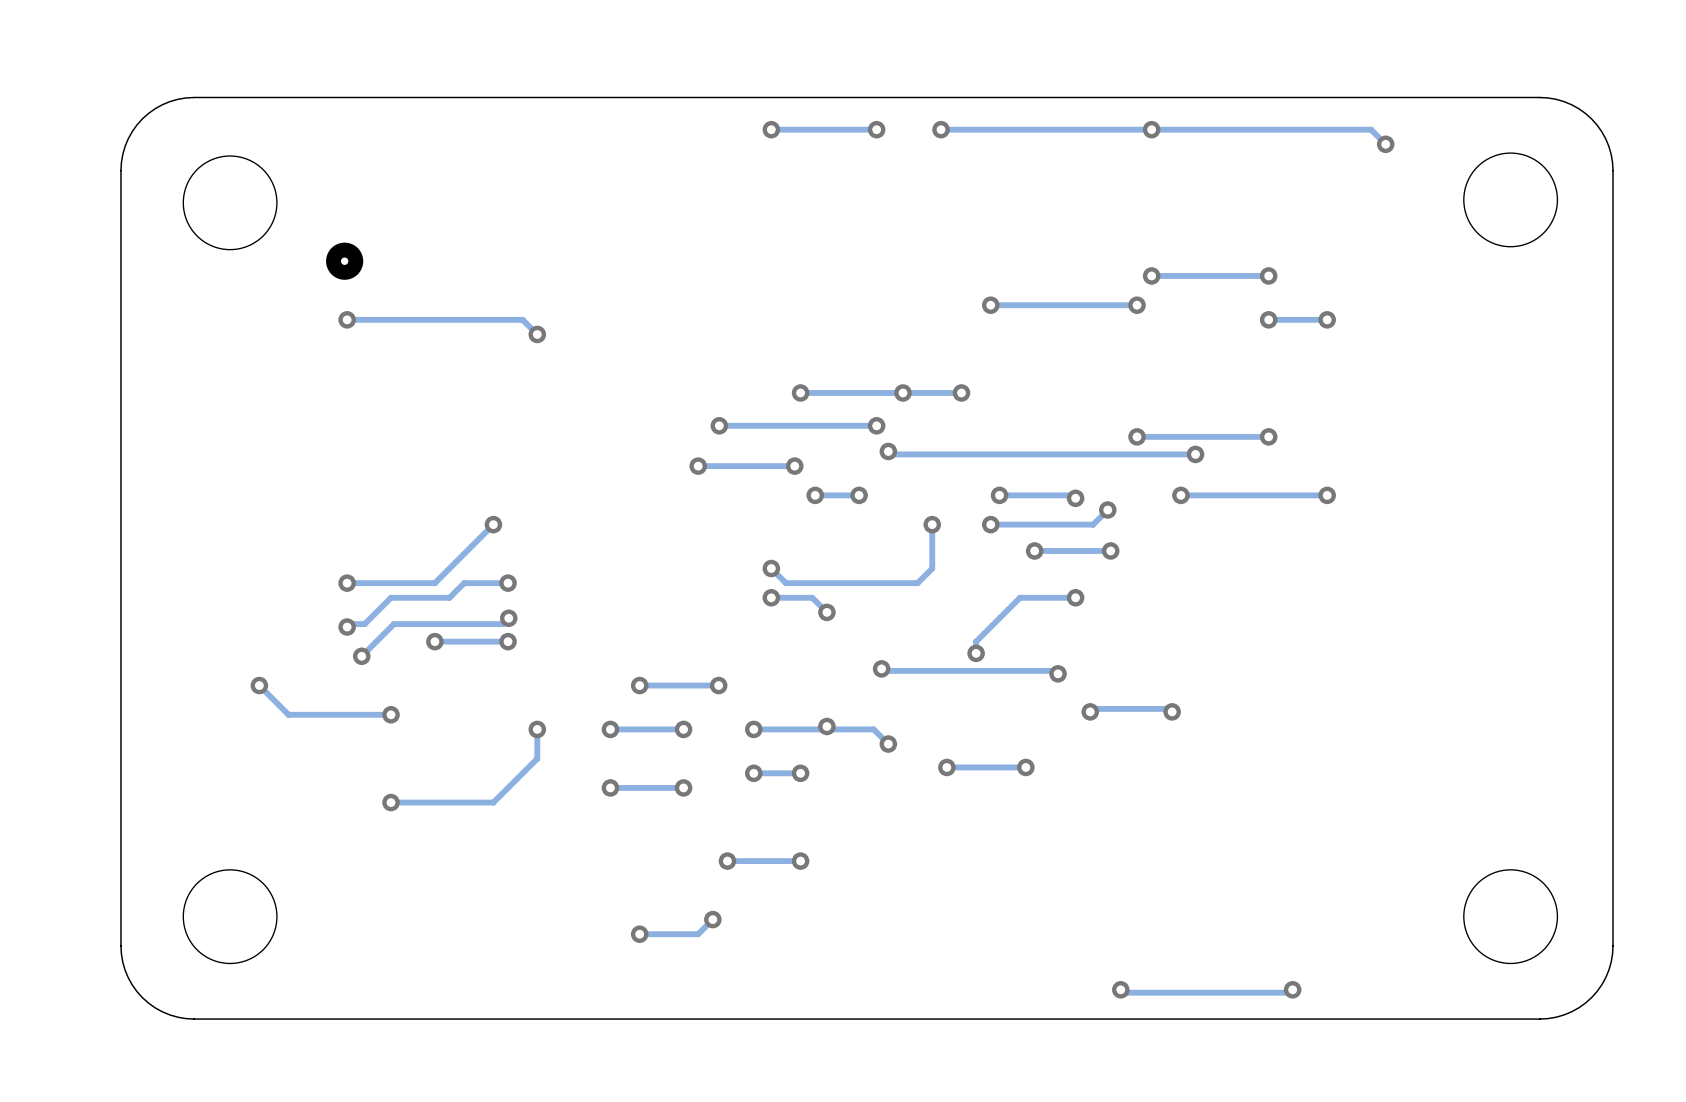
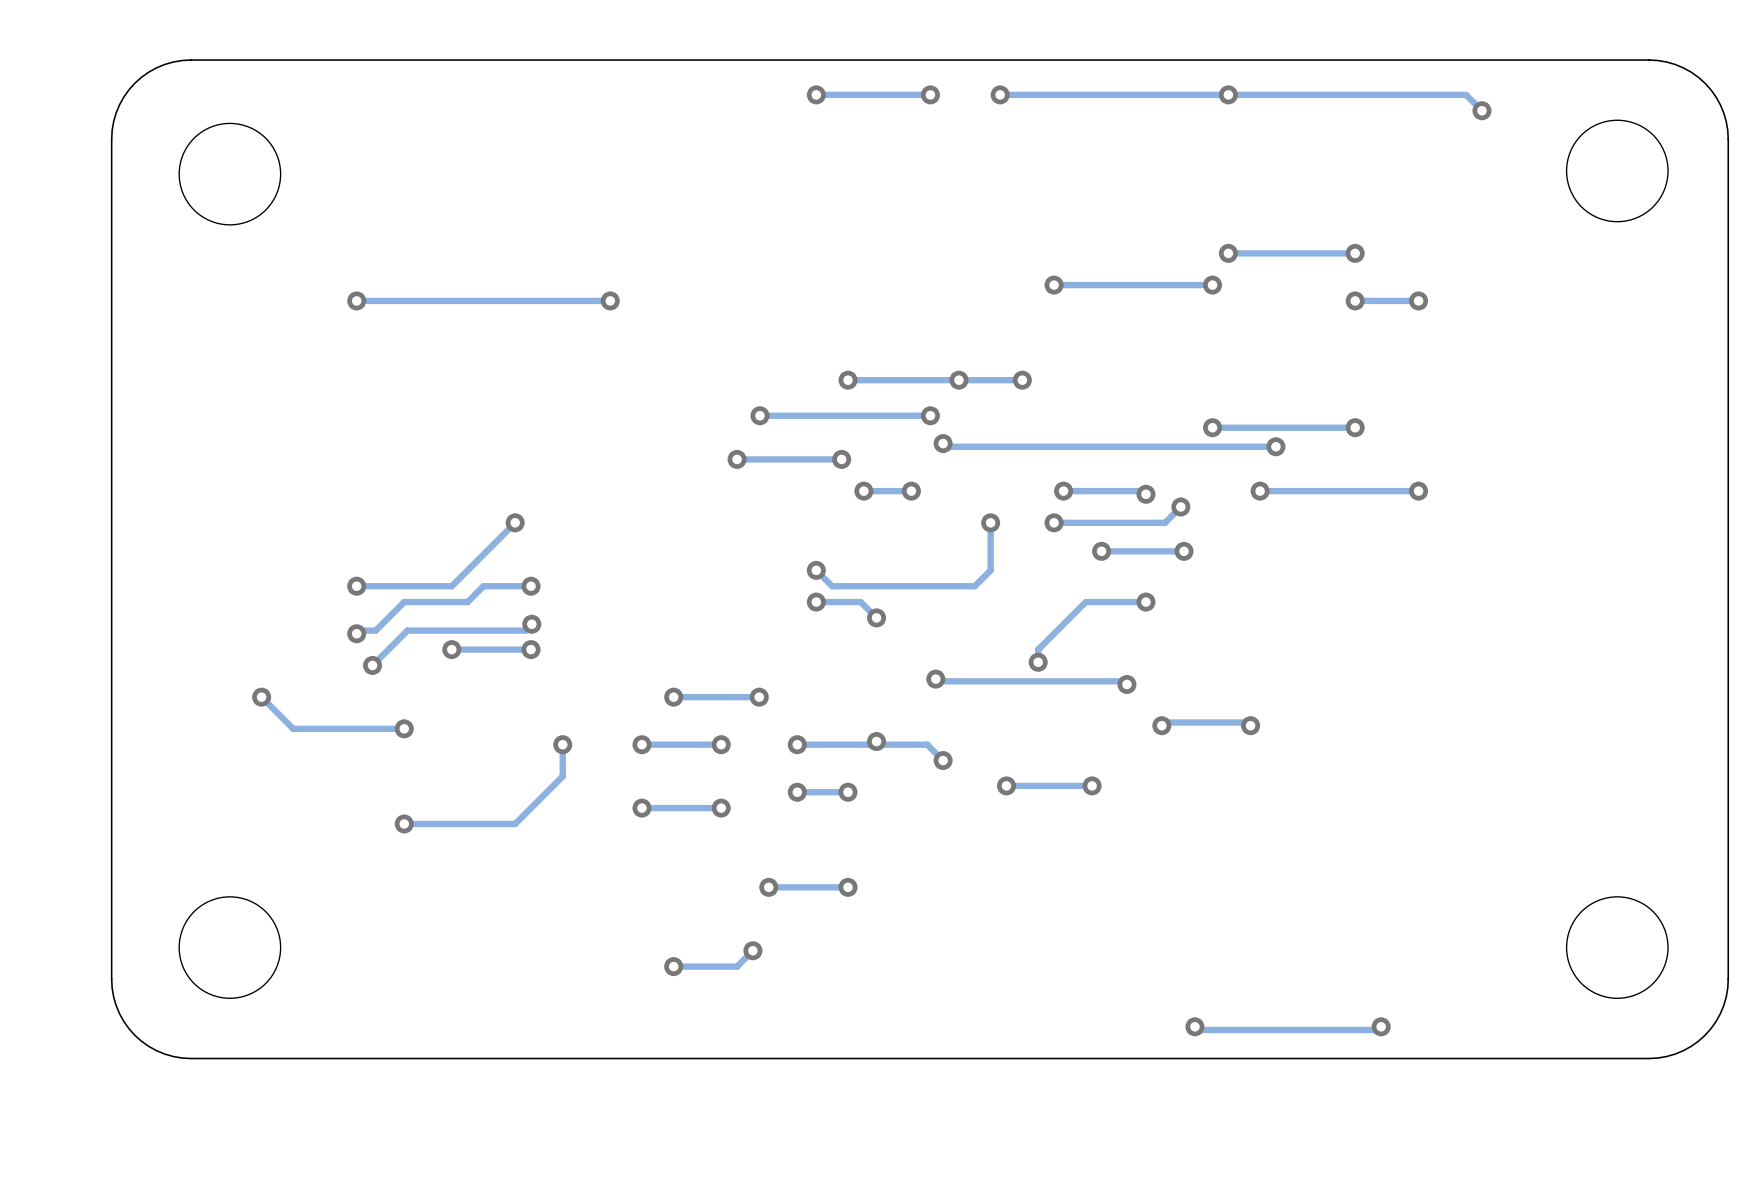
part: (344, 261) -> none
track: (522, 319) (537, 334) -> (546, 300) (610, 300)
via position: (537, 334) -> (610, 300)

